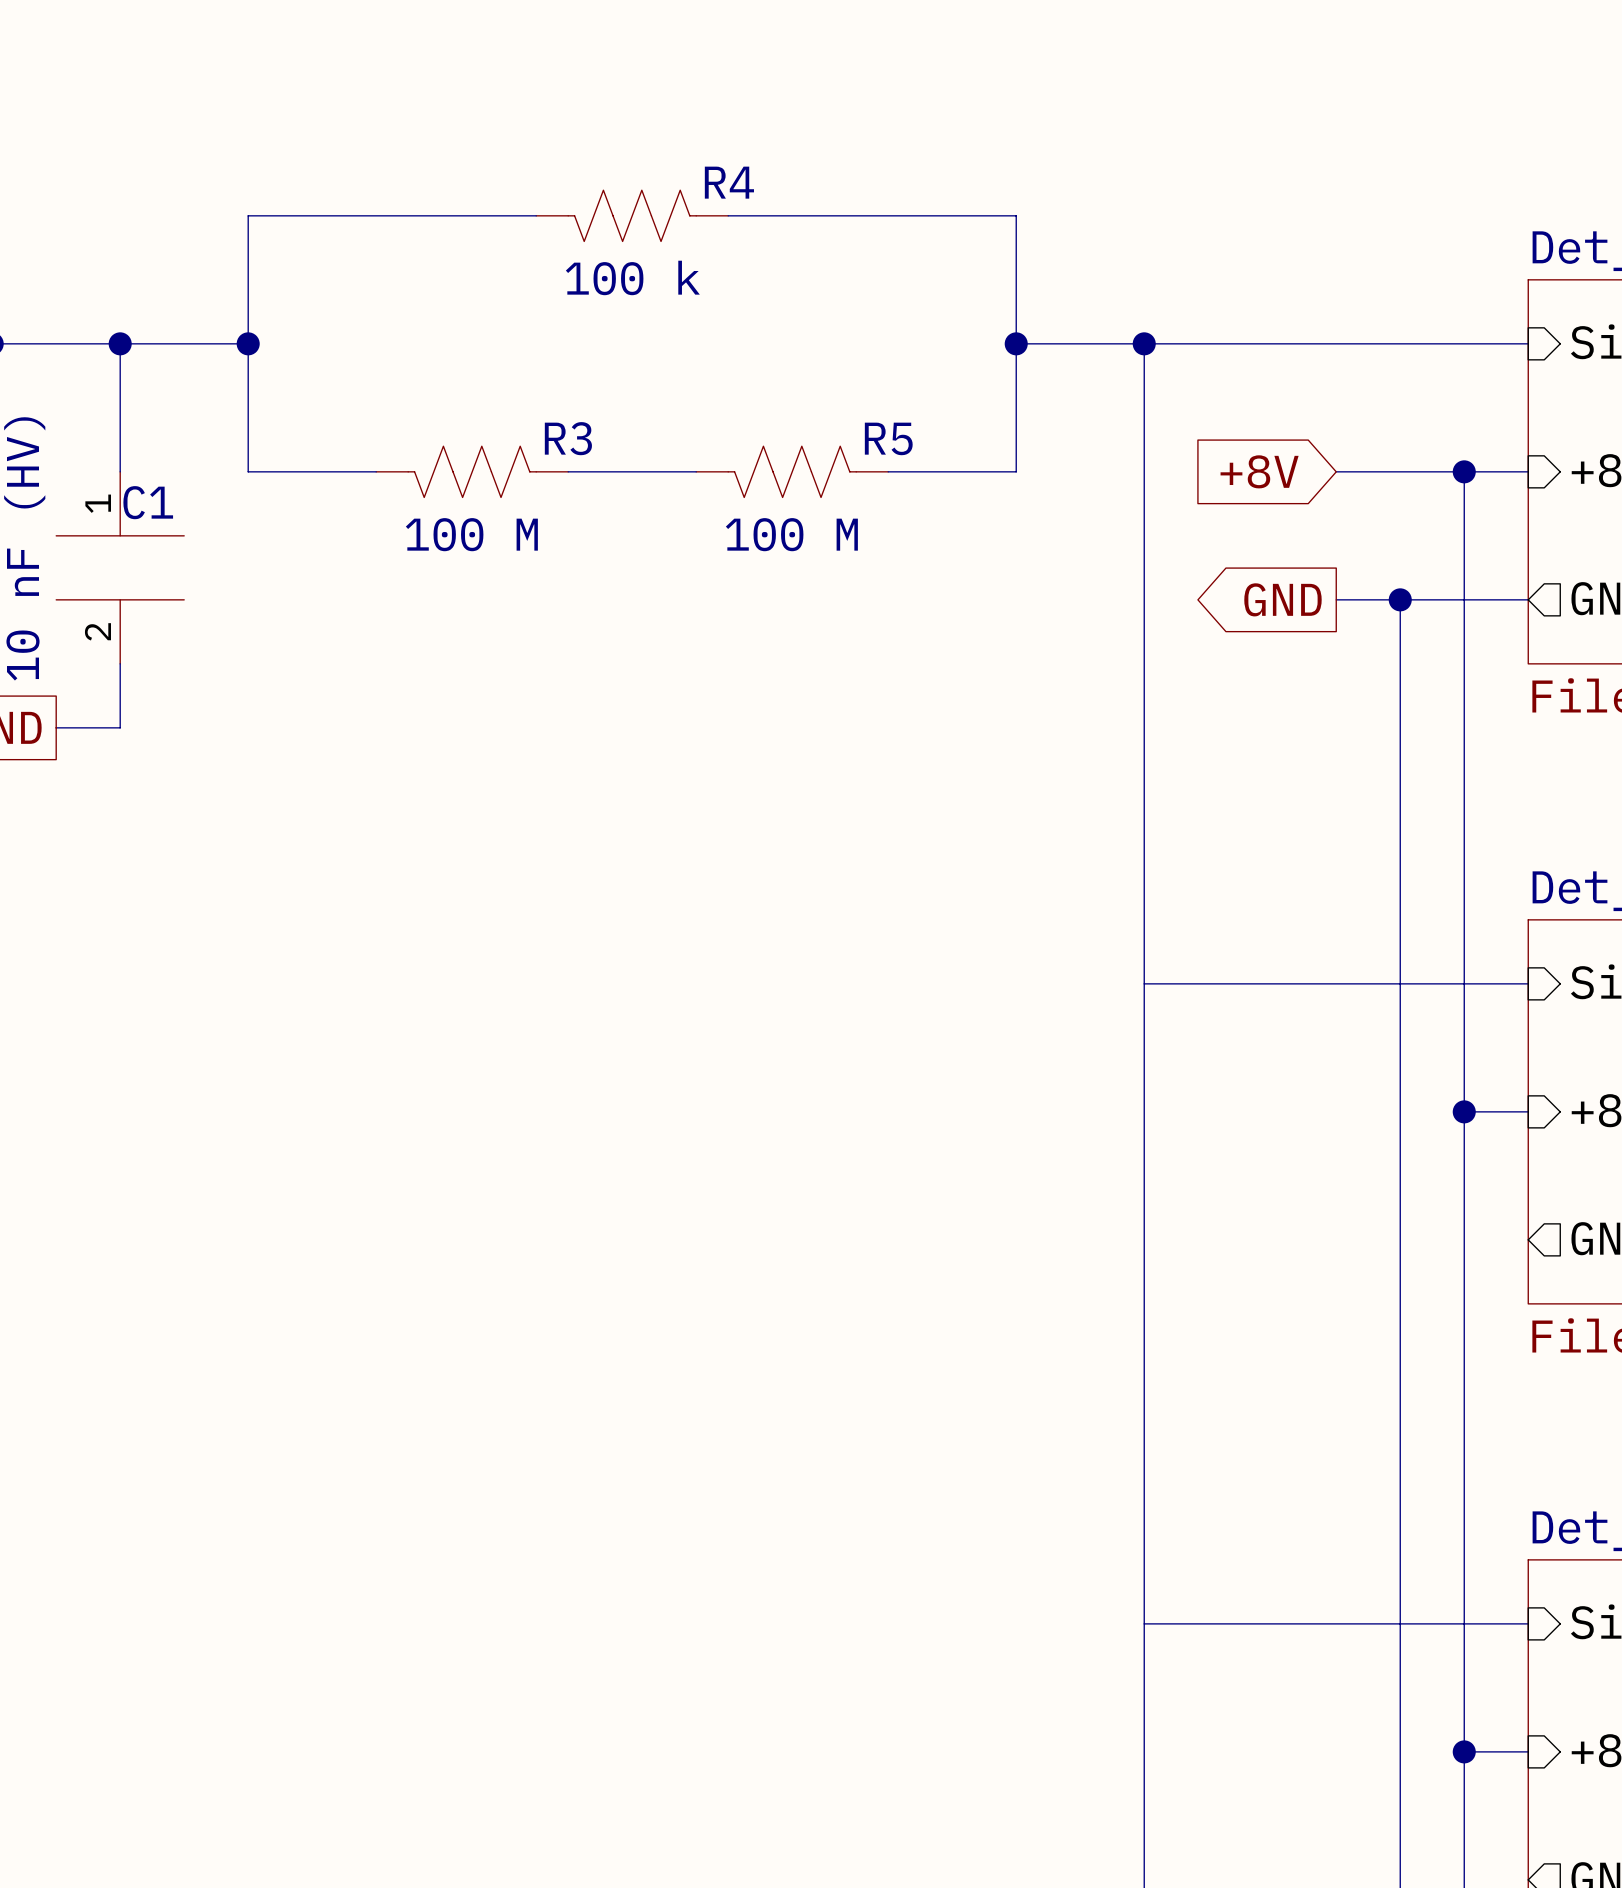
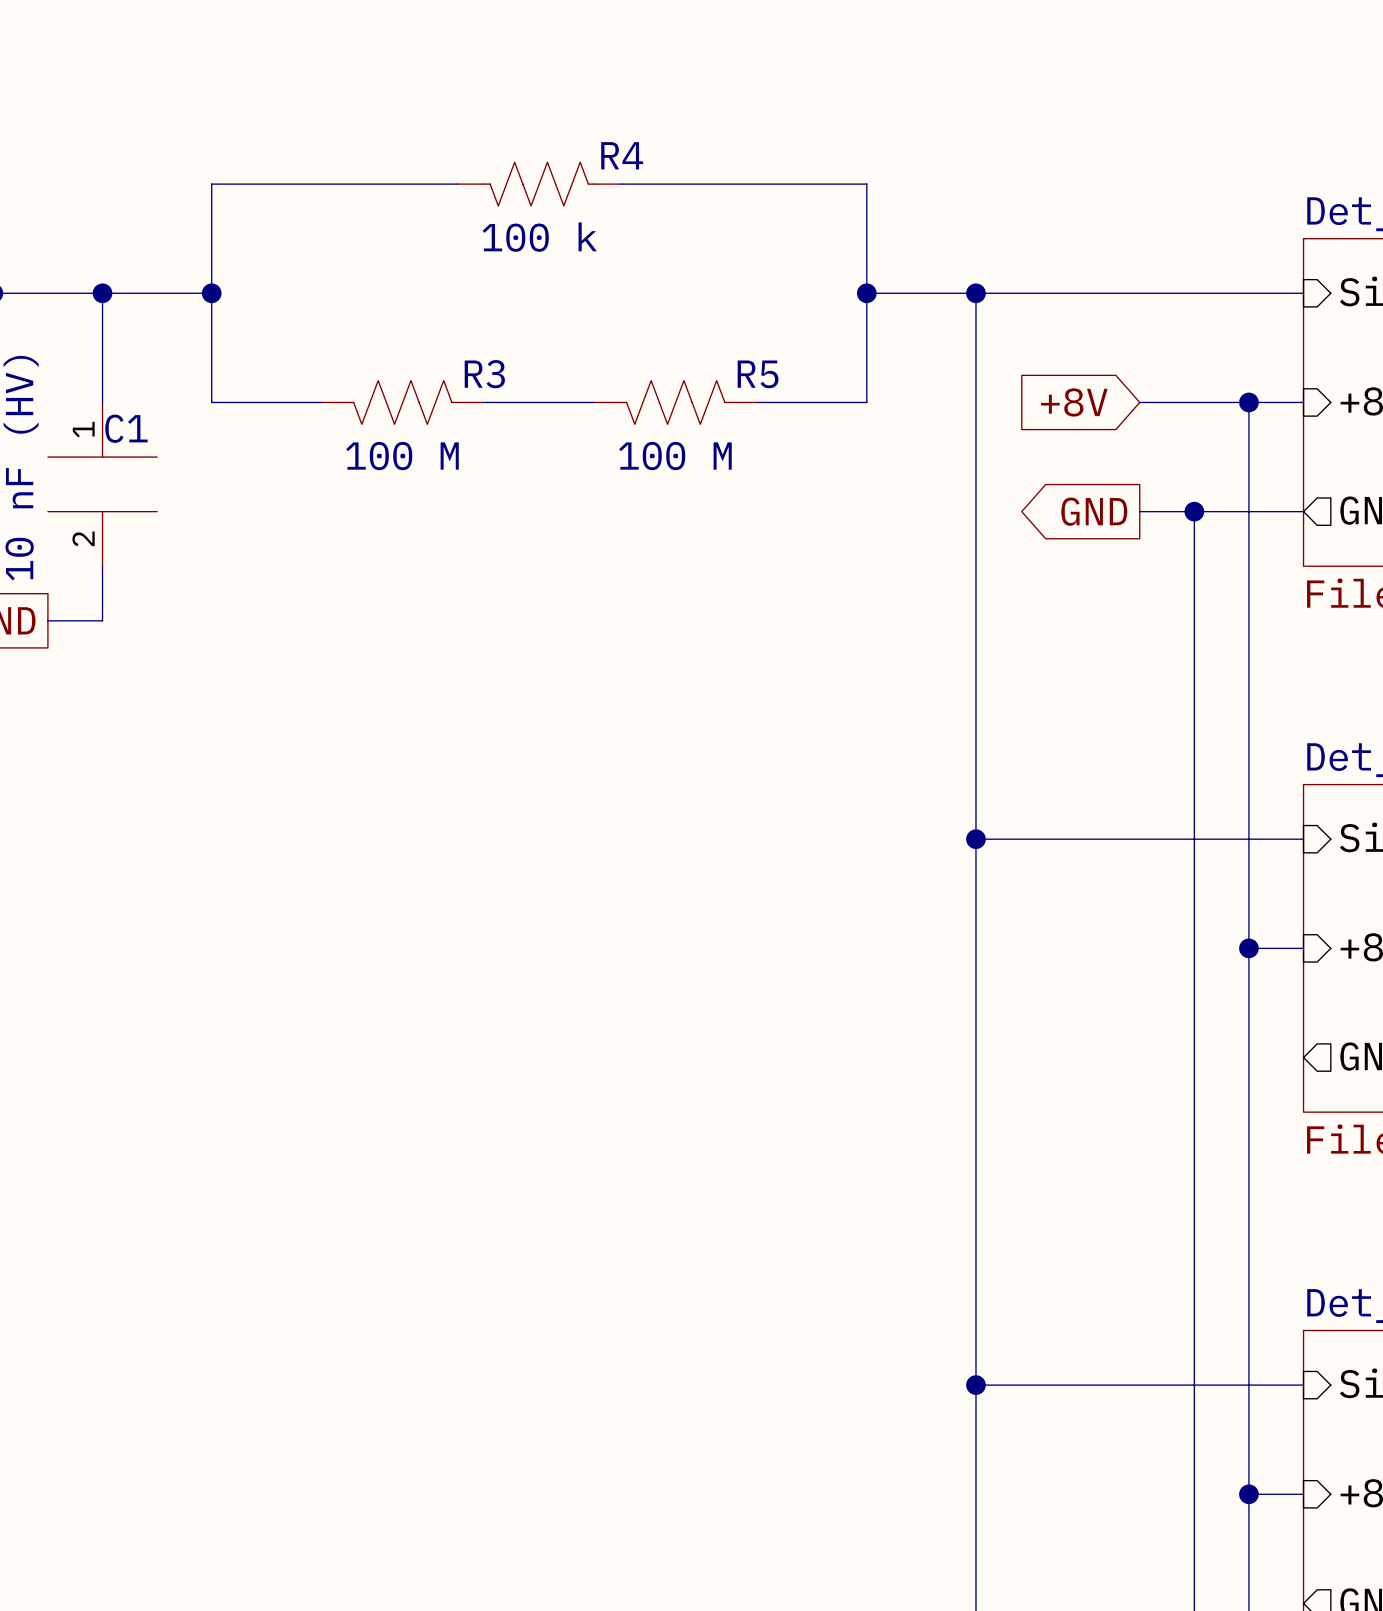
junction: none -> (975, 839)
junction: none -> (975, 1385)

